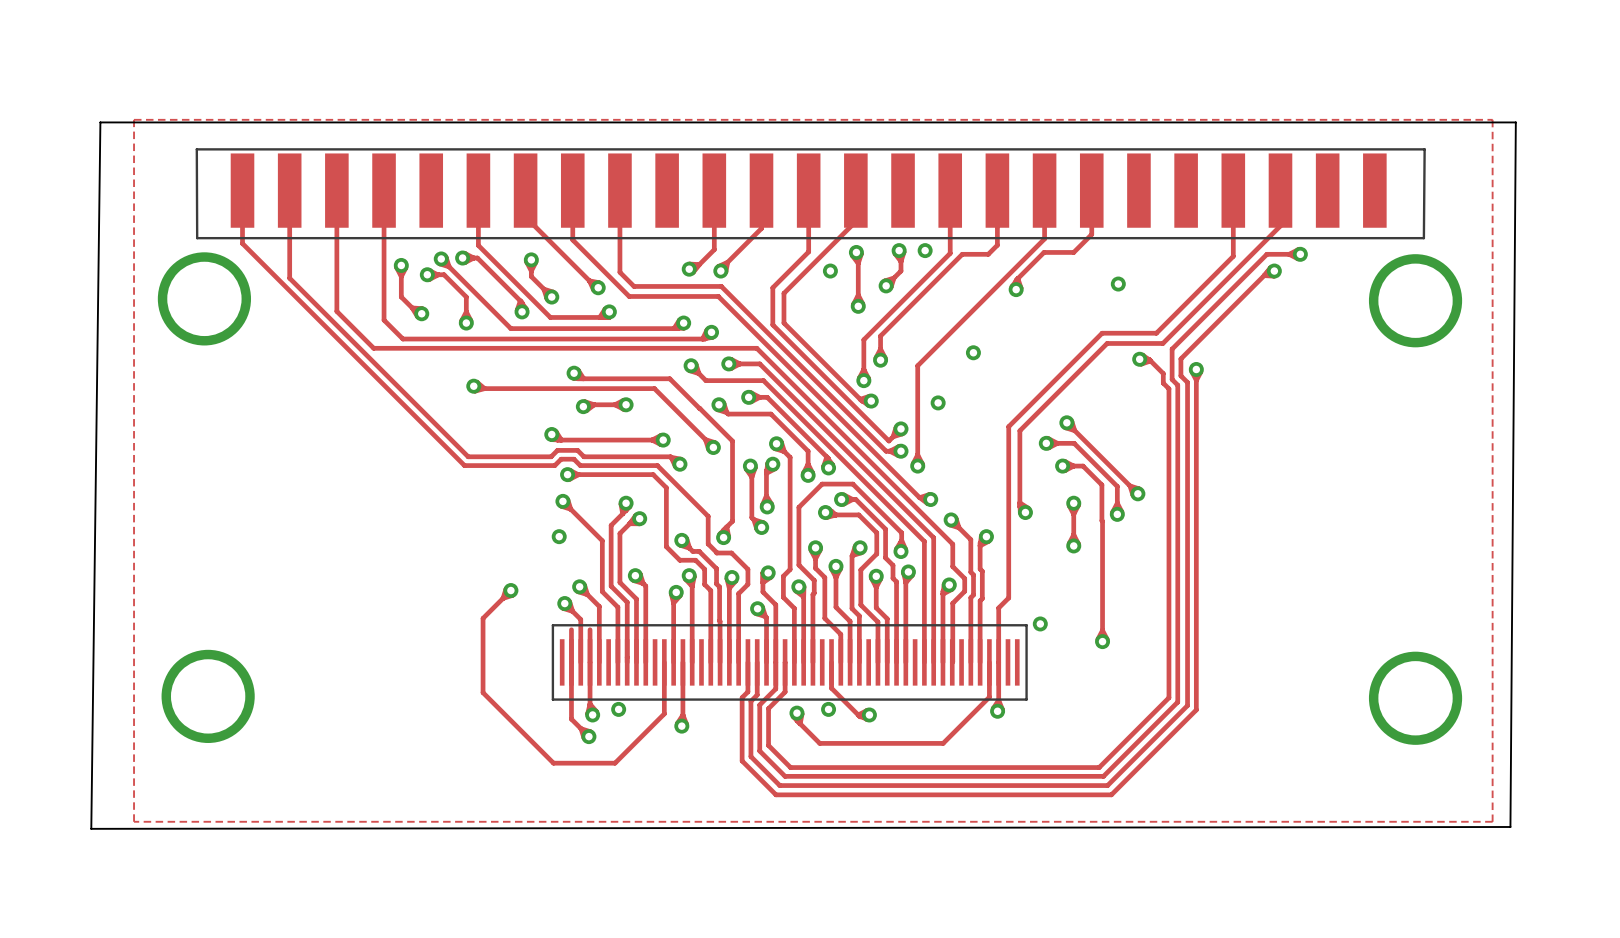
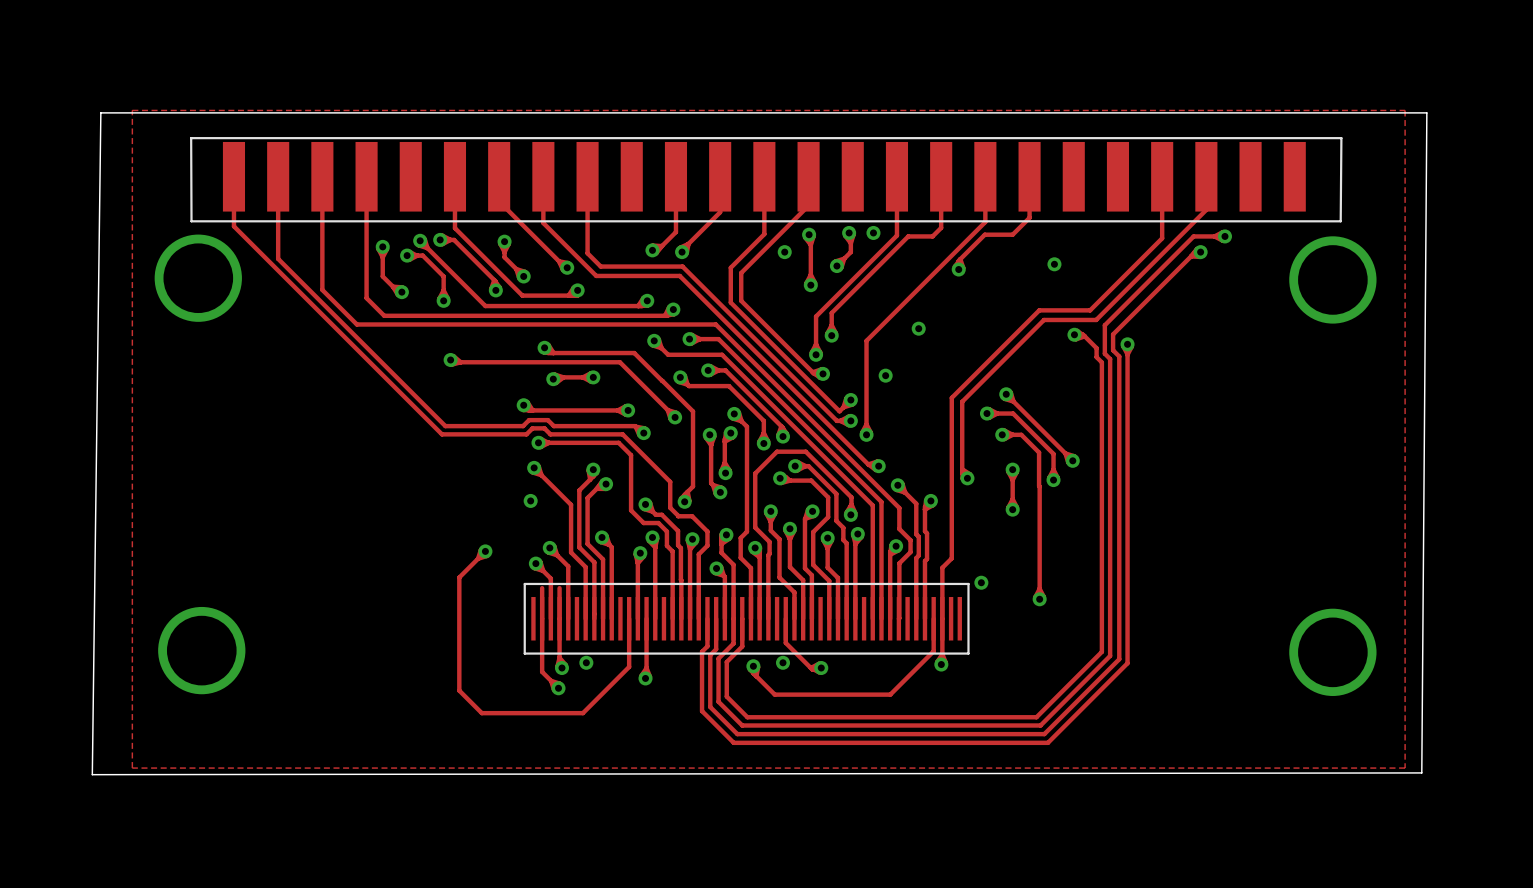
track: (483, 692) (553, 763) -> (459, 647) (459, 690) (481, 713) (525, 713)

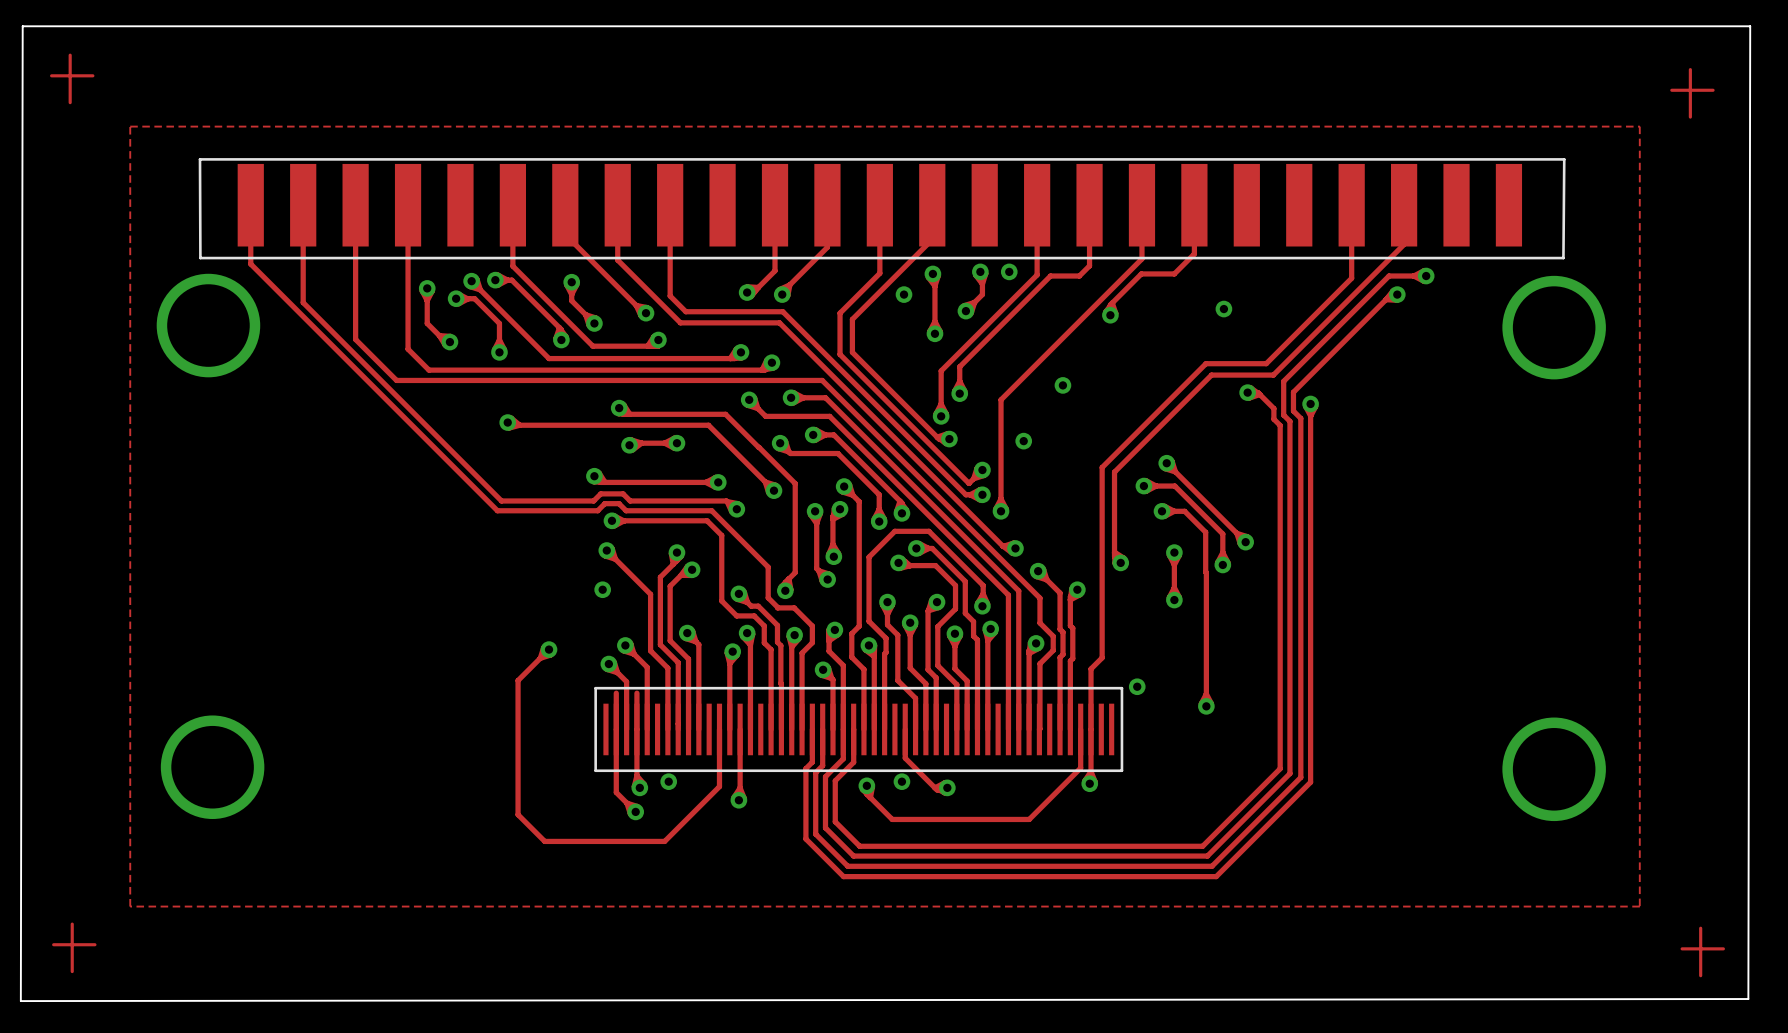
track: none -> (70, 55) (70, 102)
track: none -> (1690, 69) (1690, 117)
track: none -> (51, 75) (92, 75)
track: none -> (1671, 90) (1713, 90)
board edge: (100, 112) (1426, 112) (1421, 772) (92, 774) (100, 112) -> (22, 26) (20, 1001) (1748, 999) (1750, 26) (22, 26)
track: none -> (72, 924) (72, 971)
track: none -> (1700, 928) (1700, 975)
track: none -> (53, 944) (94, 944)
track: none -> (1682, 948) (1723, 948)

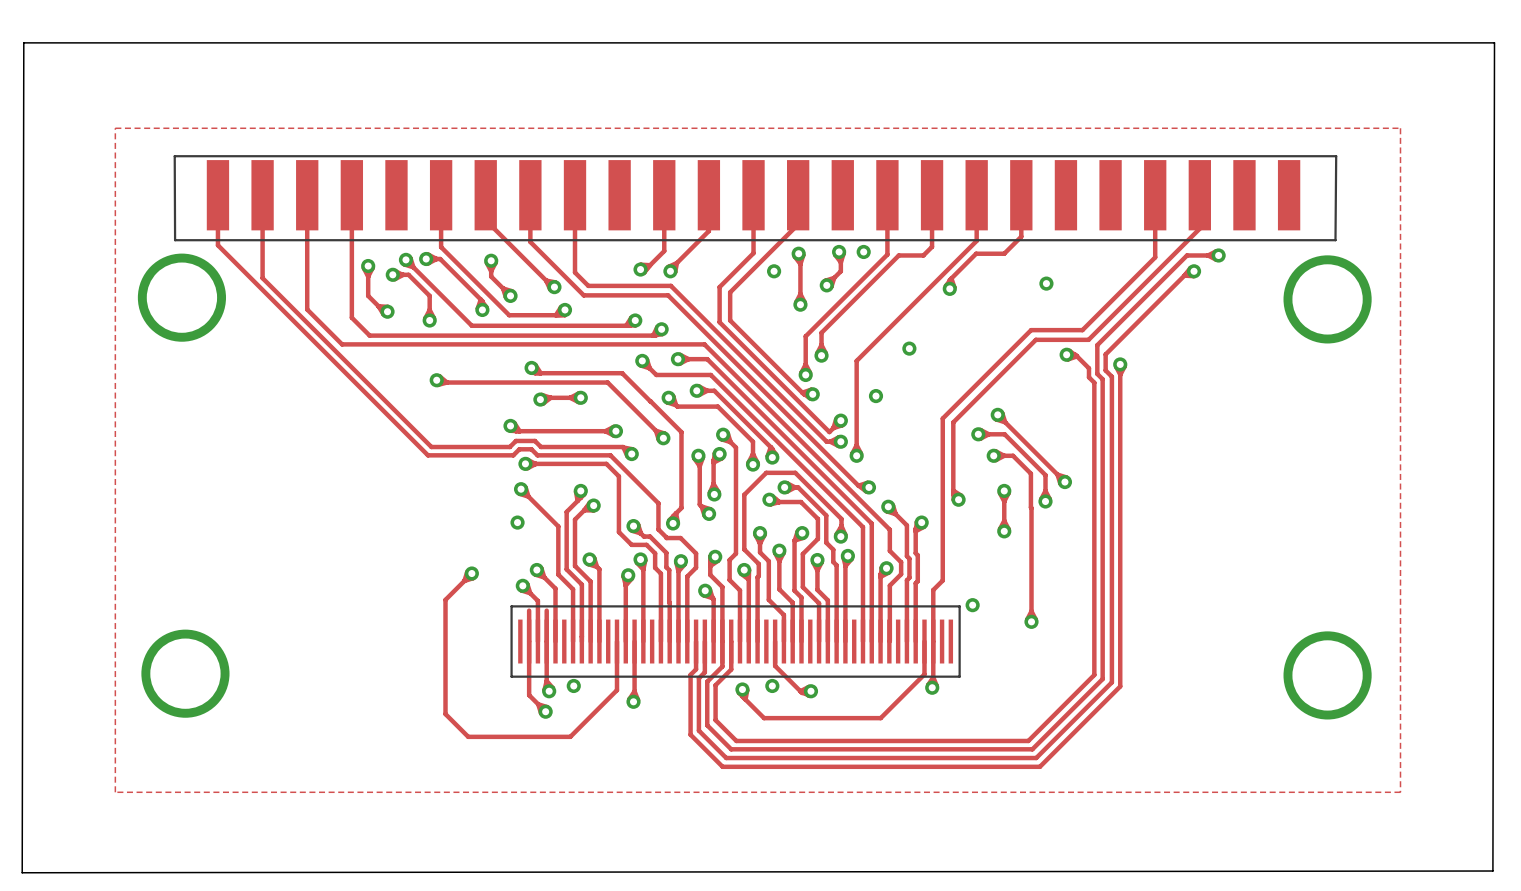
track: (70, 55) (70, 102) -> none
track: (1690, 69) (1690, 117) -> none
track: (51, 75) (92, 75) -> none
track: (1671, 90) (1713, 90) -> none
track: (72, 924) (72, 971) -> none
track: (1700, 928) (1700, 975) -> none
track: (53, 944) (94, 944) -> none
track: (1682, 948) (1723, 948) -> none

